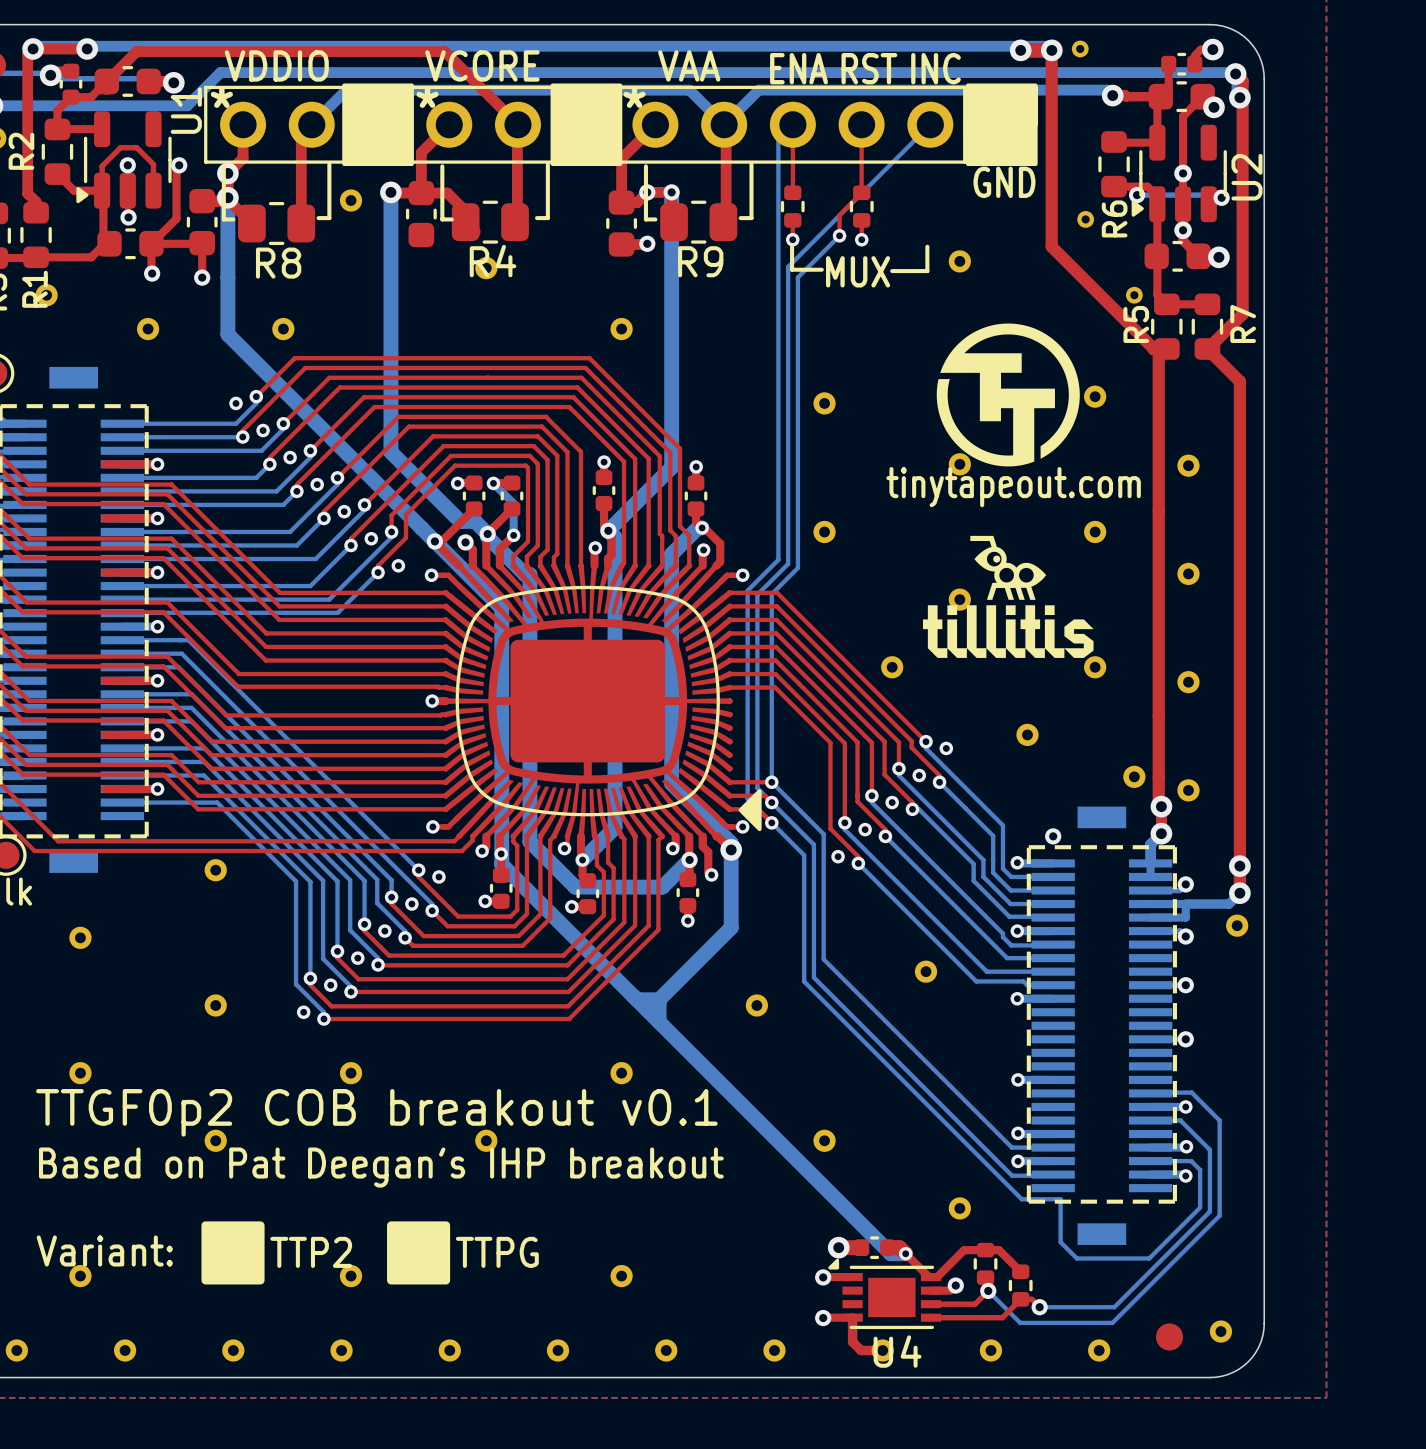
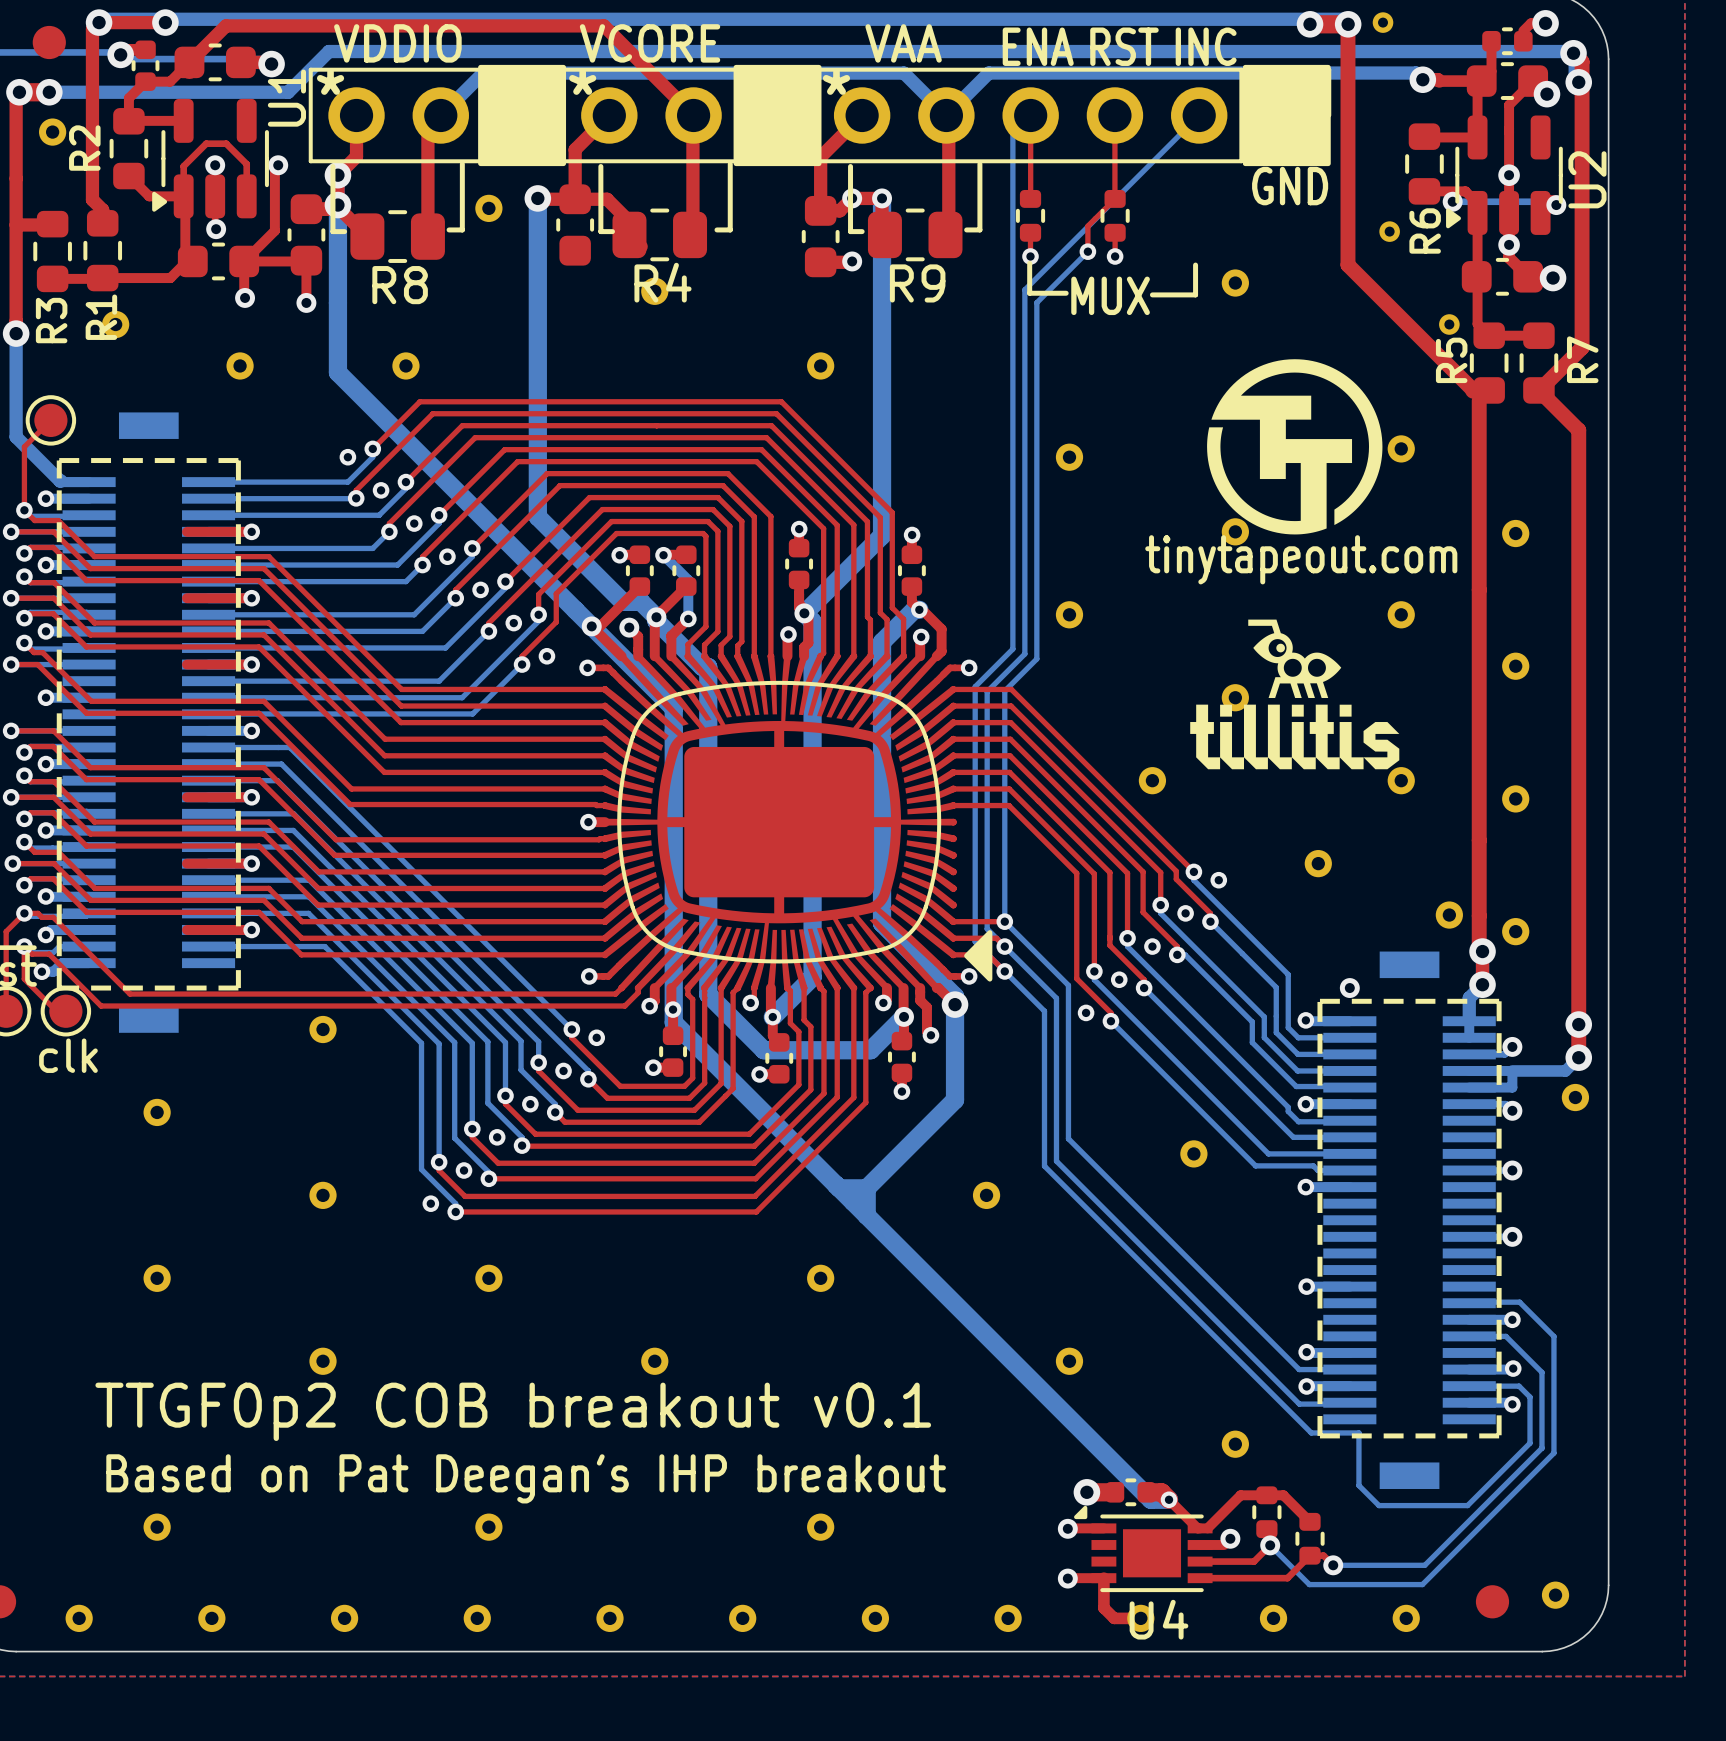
text: TTGF0p2 COB breakout v0.1 (376, 1112) -> none
text: Based on Pat Deegan's IHP breakout (381, 1167) -> TTGF0p2 COB breakout v0.1 (513, 1411)
drawing: [201, 1221, 265, 1285] -> none
drawing: [387, 1221, 451, 1285] -> none
text: Variant: (104, 1250) -> Based on Pat Deegan's IHP breakout (526, 1478)
text: TTP2 (311, 1252) -> none
text: TTPG (497, 1252) -> none

